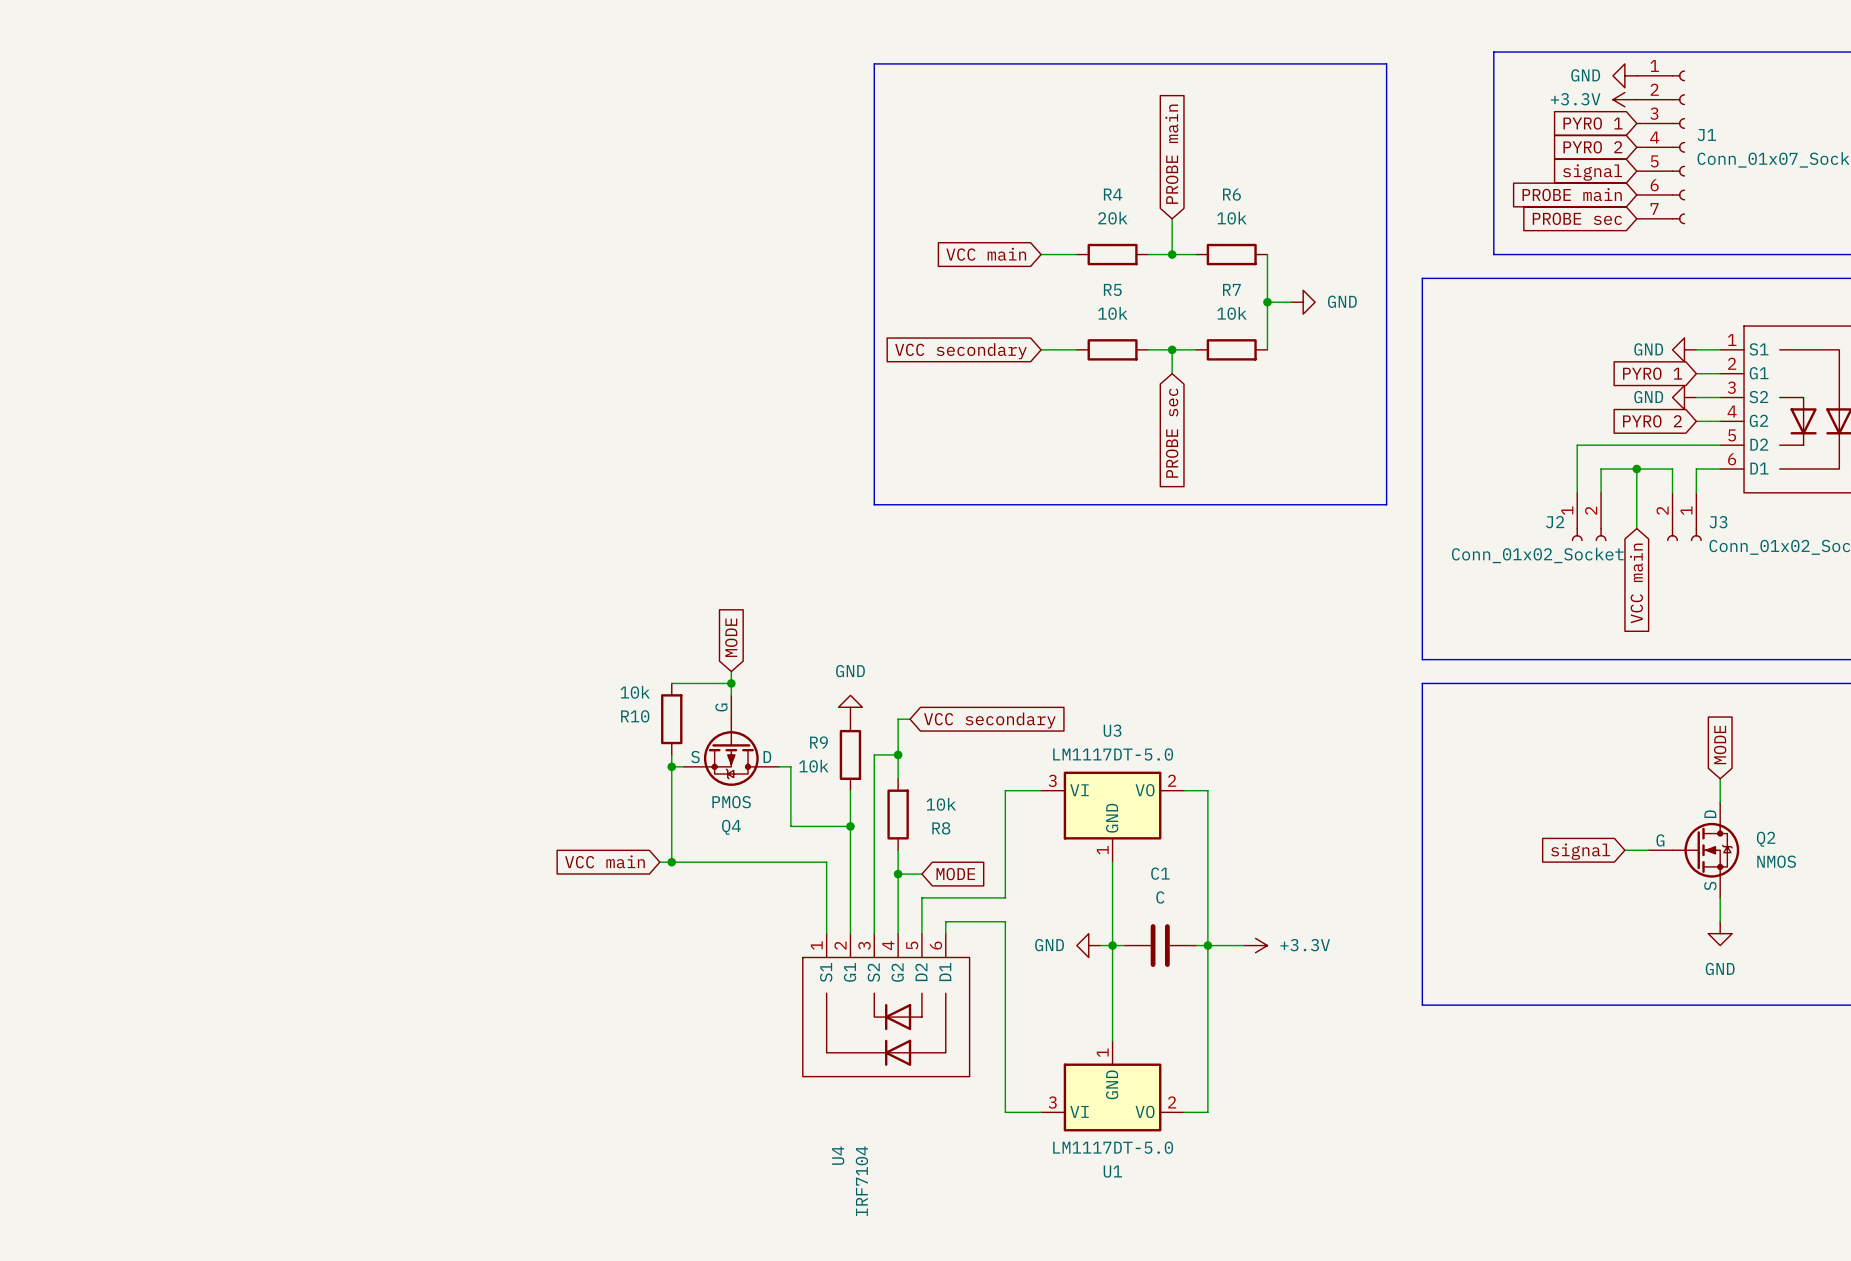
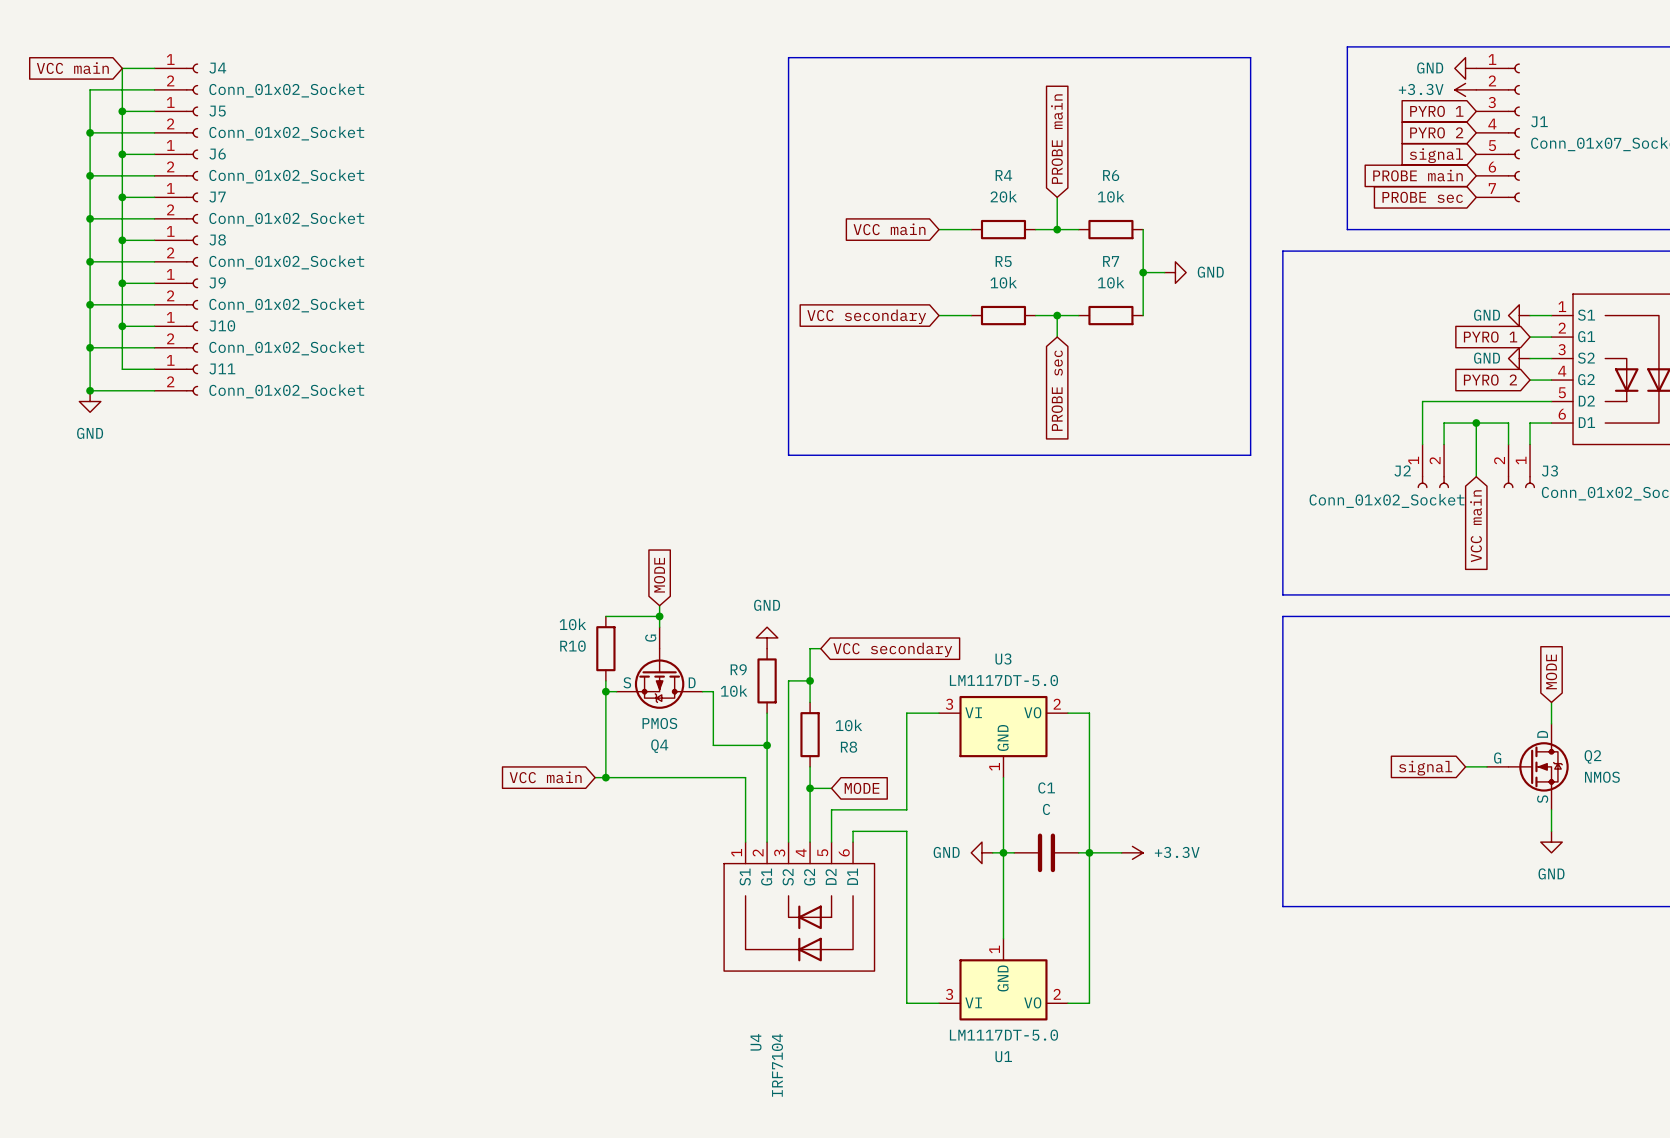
global label: none -> VCC main (72, 68)
wire: none -> (154, 68) (122, 68) (122, 369) (154, 369)
J4: none -> Conn_01x02_Socket (176, 79)
wire: none -> (154, 89) (90, 89) (90, 390) (154, 390)
wire: none -> (122, 111) (154, 111)
junction: none -> (122, 111)
J5: none -> Conn_01x02_Socket (176, 122)
wire: none -> (90, 132) (154, 132)
junction: none -> (90, 132)
wire: none -> (122, 154) (154, 154)
junction: none -> (122, 154)
J6: none -> Conn_01x02_Socket (176, 165)
wire: none -> (90, 175) (154, 175)
junction: none -> (90, 175)
wire: none -> (122, 197) (154, 197)
junction: none -> (122, 197)
J7: none -> Conn_01x02_Socket (176, 208)
wire: none -> (90, 218) (154, 218)
junction: none -> (90, 218)
wire: none -> (122, 240) (154, 240)
junction: none -> (122, 240)
J8: none -> Conn_01x02_Socket (176, 251)
wire: none -> (90, 261) (154, 261)
junction: none -> (90, 261)
wire: none -> (122, 283) (154, 283)
junction: none -> (122, 283)
J9: none -> Conn_01x02_Socket (176, 294)
wire: none -> (90, 304) (154, 304)
junction: none -> (90, 304)
wire: none -> (122, 326) (154, 326)
junction: none -> (122, 326)
J10: none -> Conn_01x02_Socket (176, 337)
wire: none -> (90, 347) (154, 347)
junction: none -> (90, 347)
J11: none -> Conn_01x02_Socket (176, 380)
junction: none -> (90, 390)
power symbol: none -> GND (90, 401)

